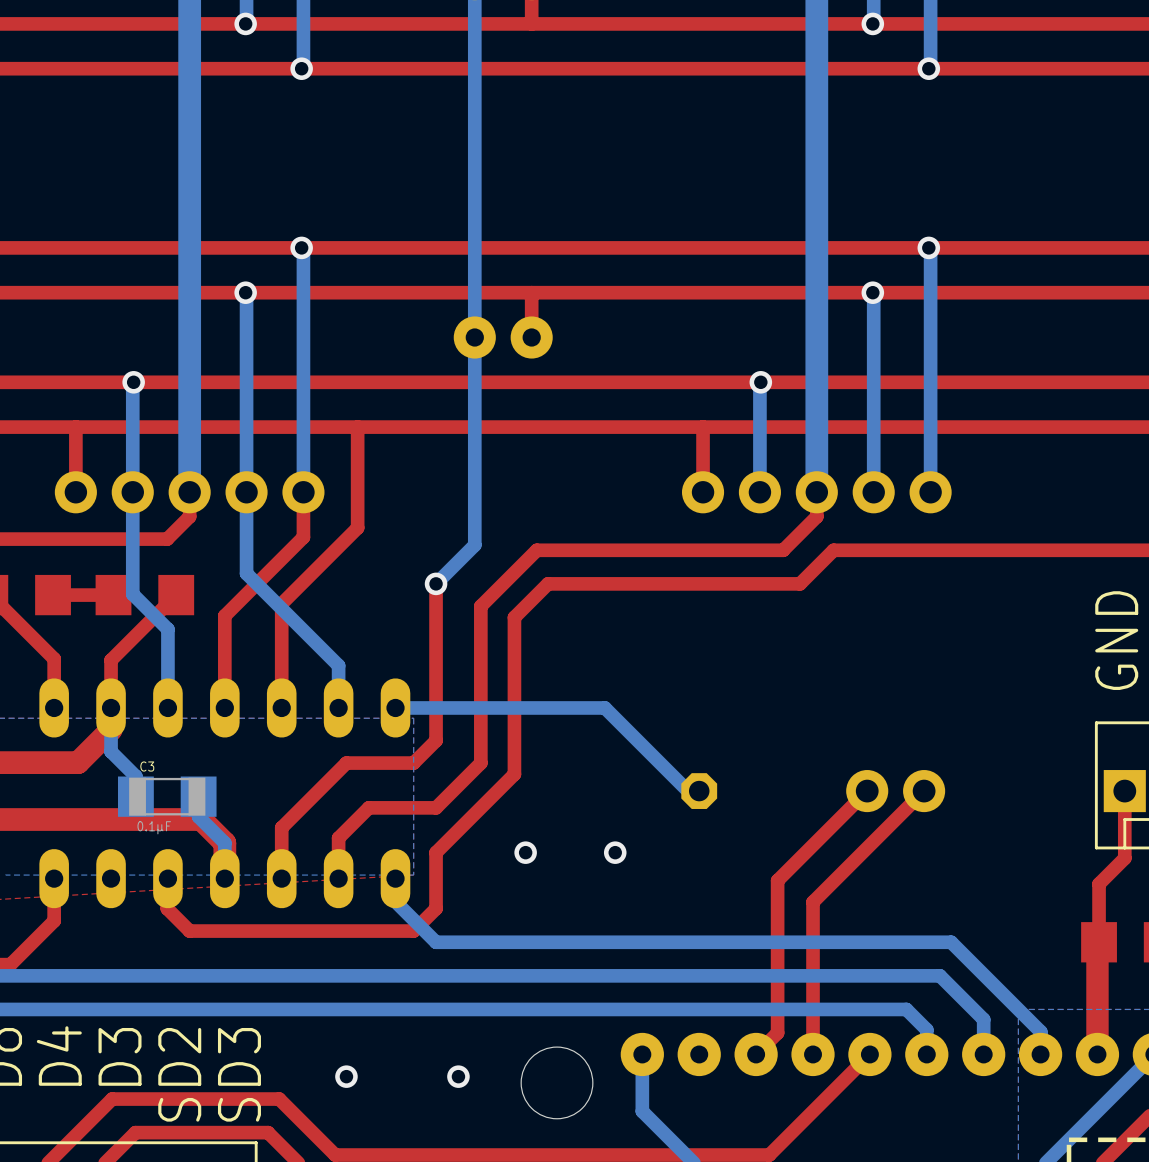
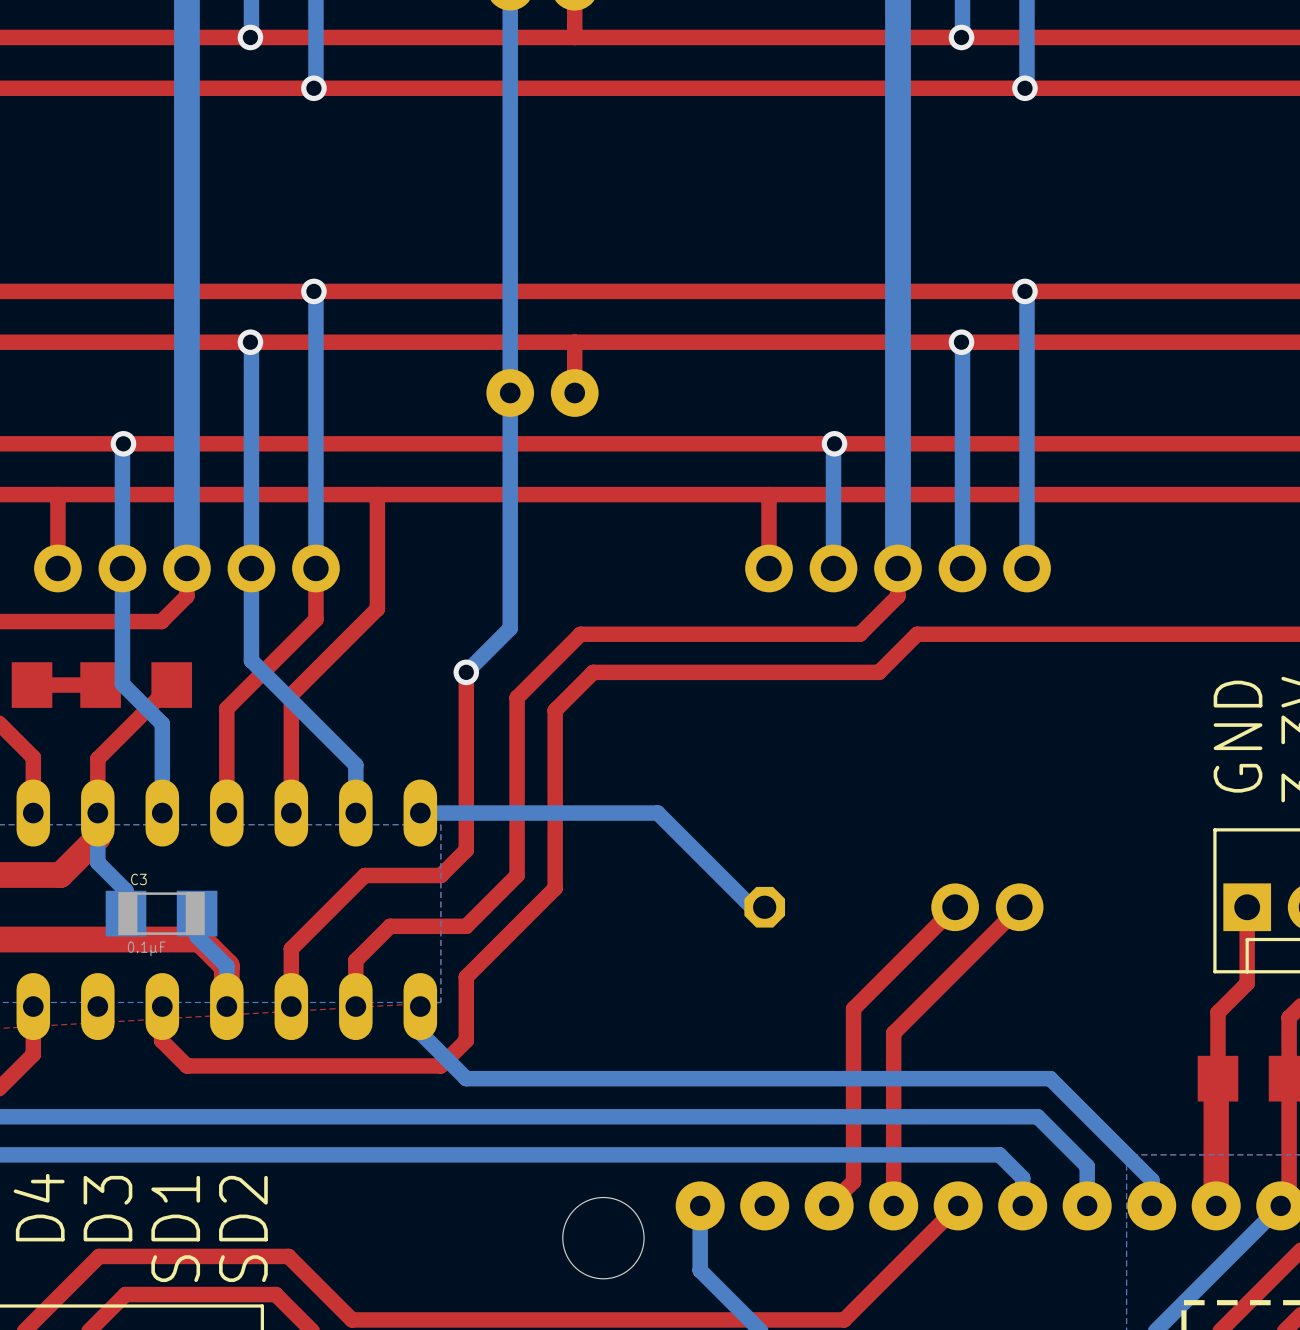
via: (525, 852) -> none
via: (615, 852) -> none
text: SD2 (179, 1074) -> SD1 (175, 1228)
text: SD3 (239, 1074) -> SD2 (243, 1228)
via: (346, 1076) -> none
via: (458, 1076) -> none

